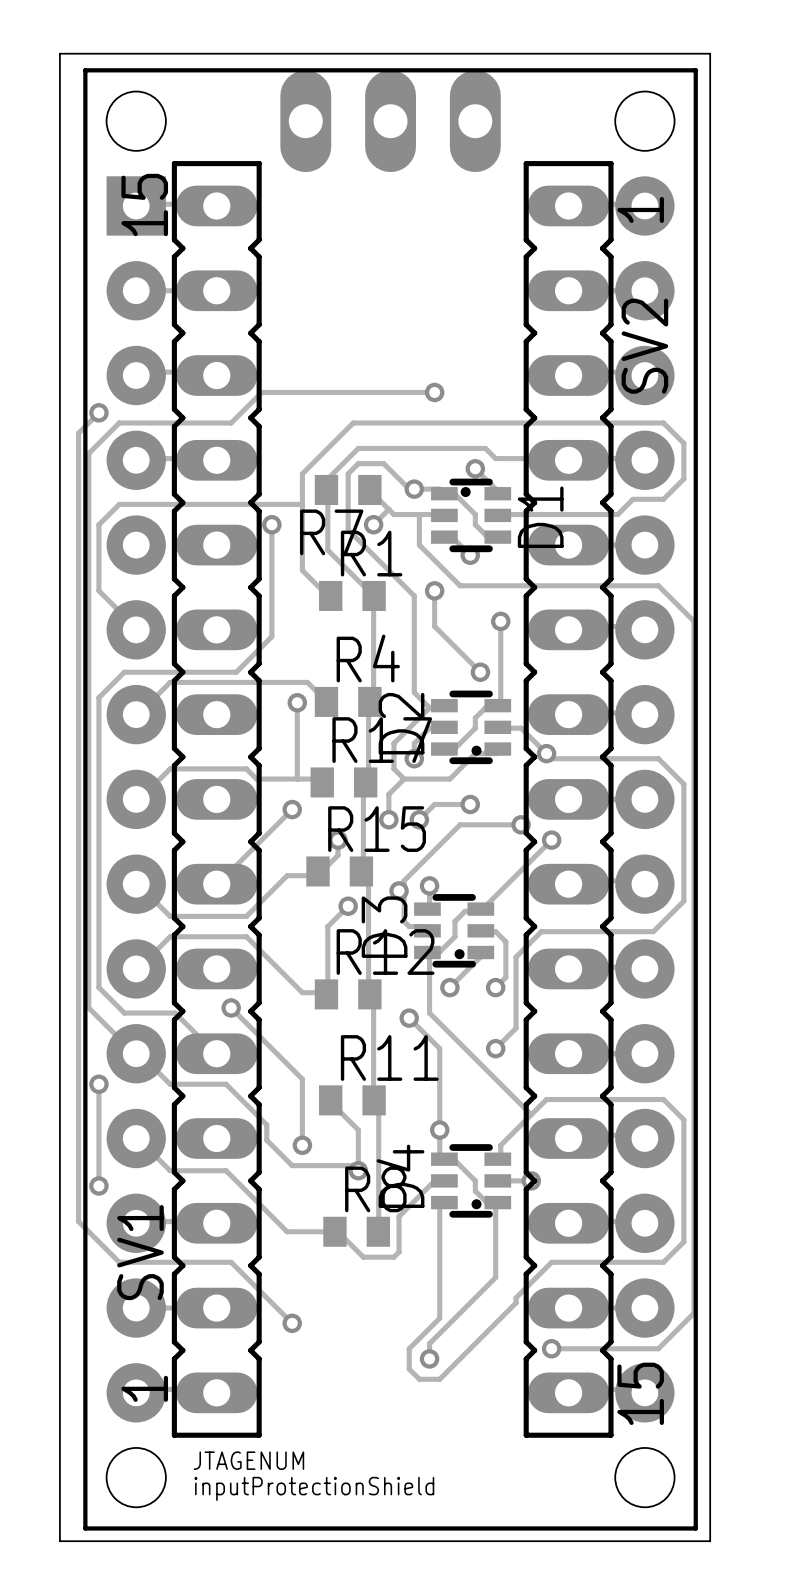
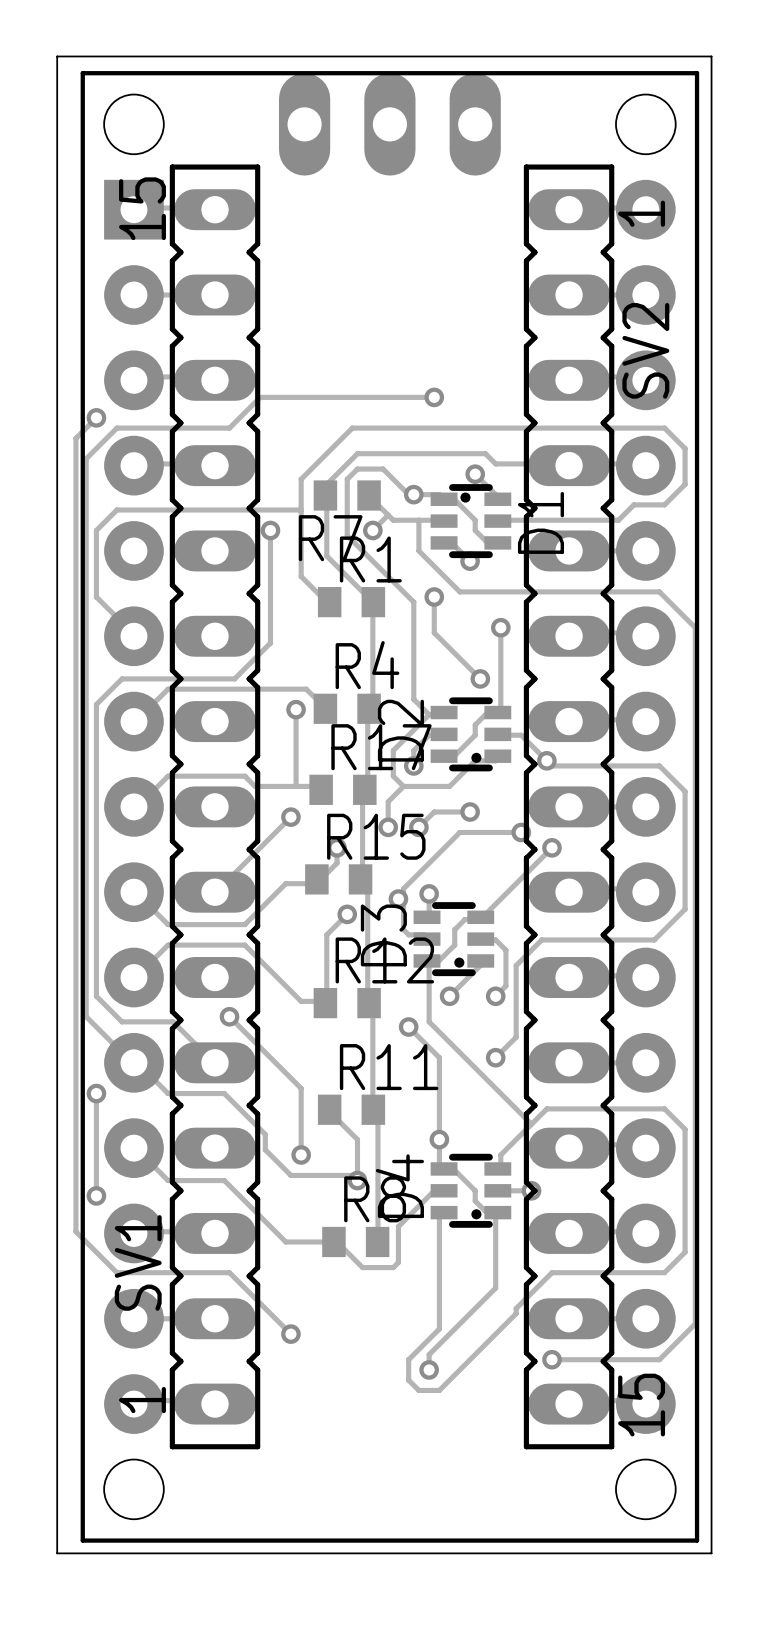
text: JTAGENUM (248, 1460) -> none
text: inputProtectionShield (314, 1488) -> none

